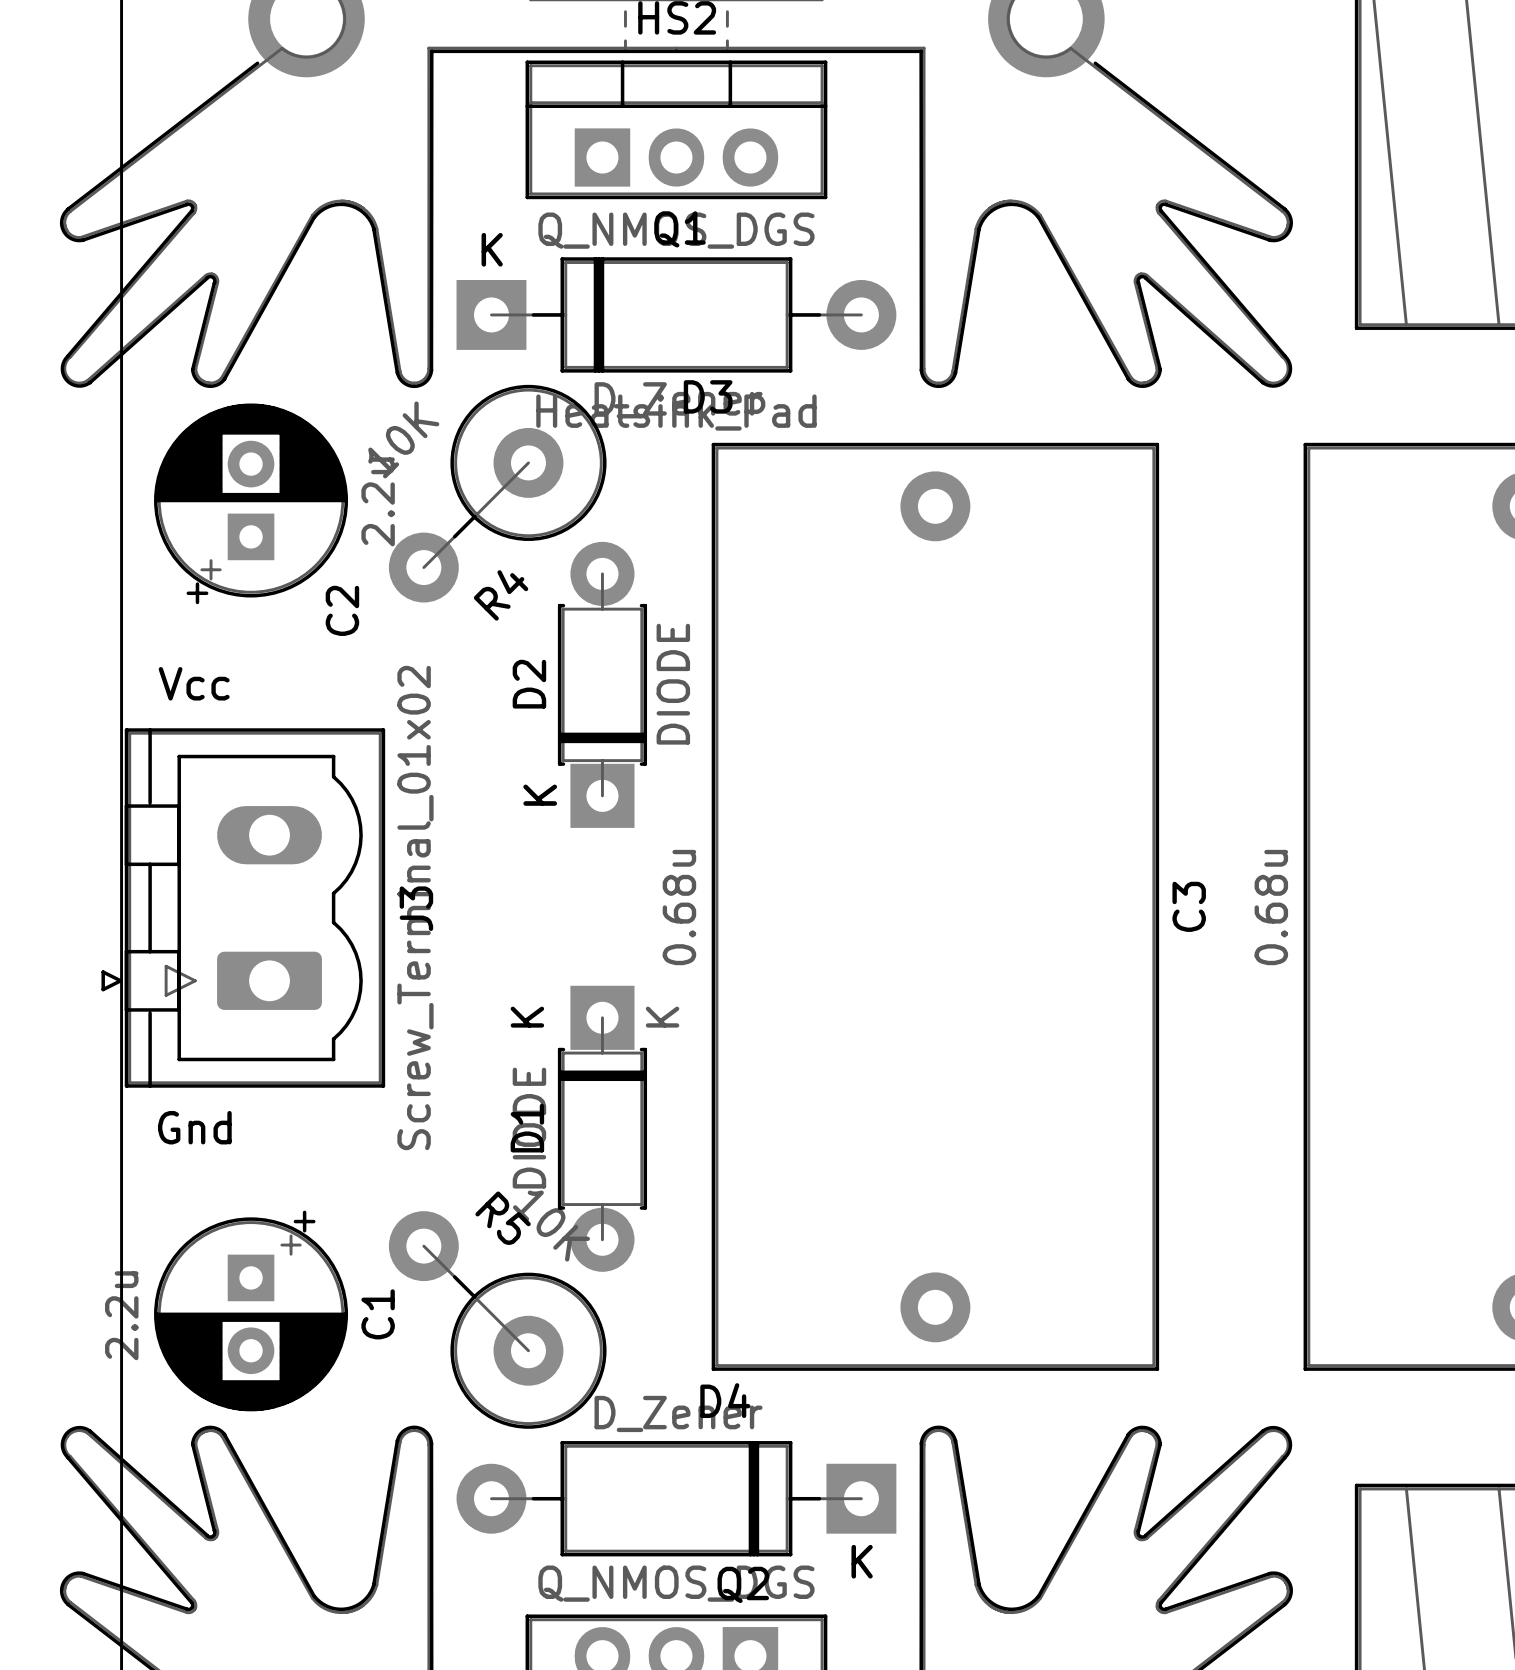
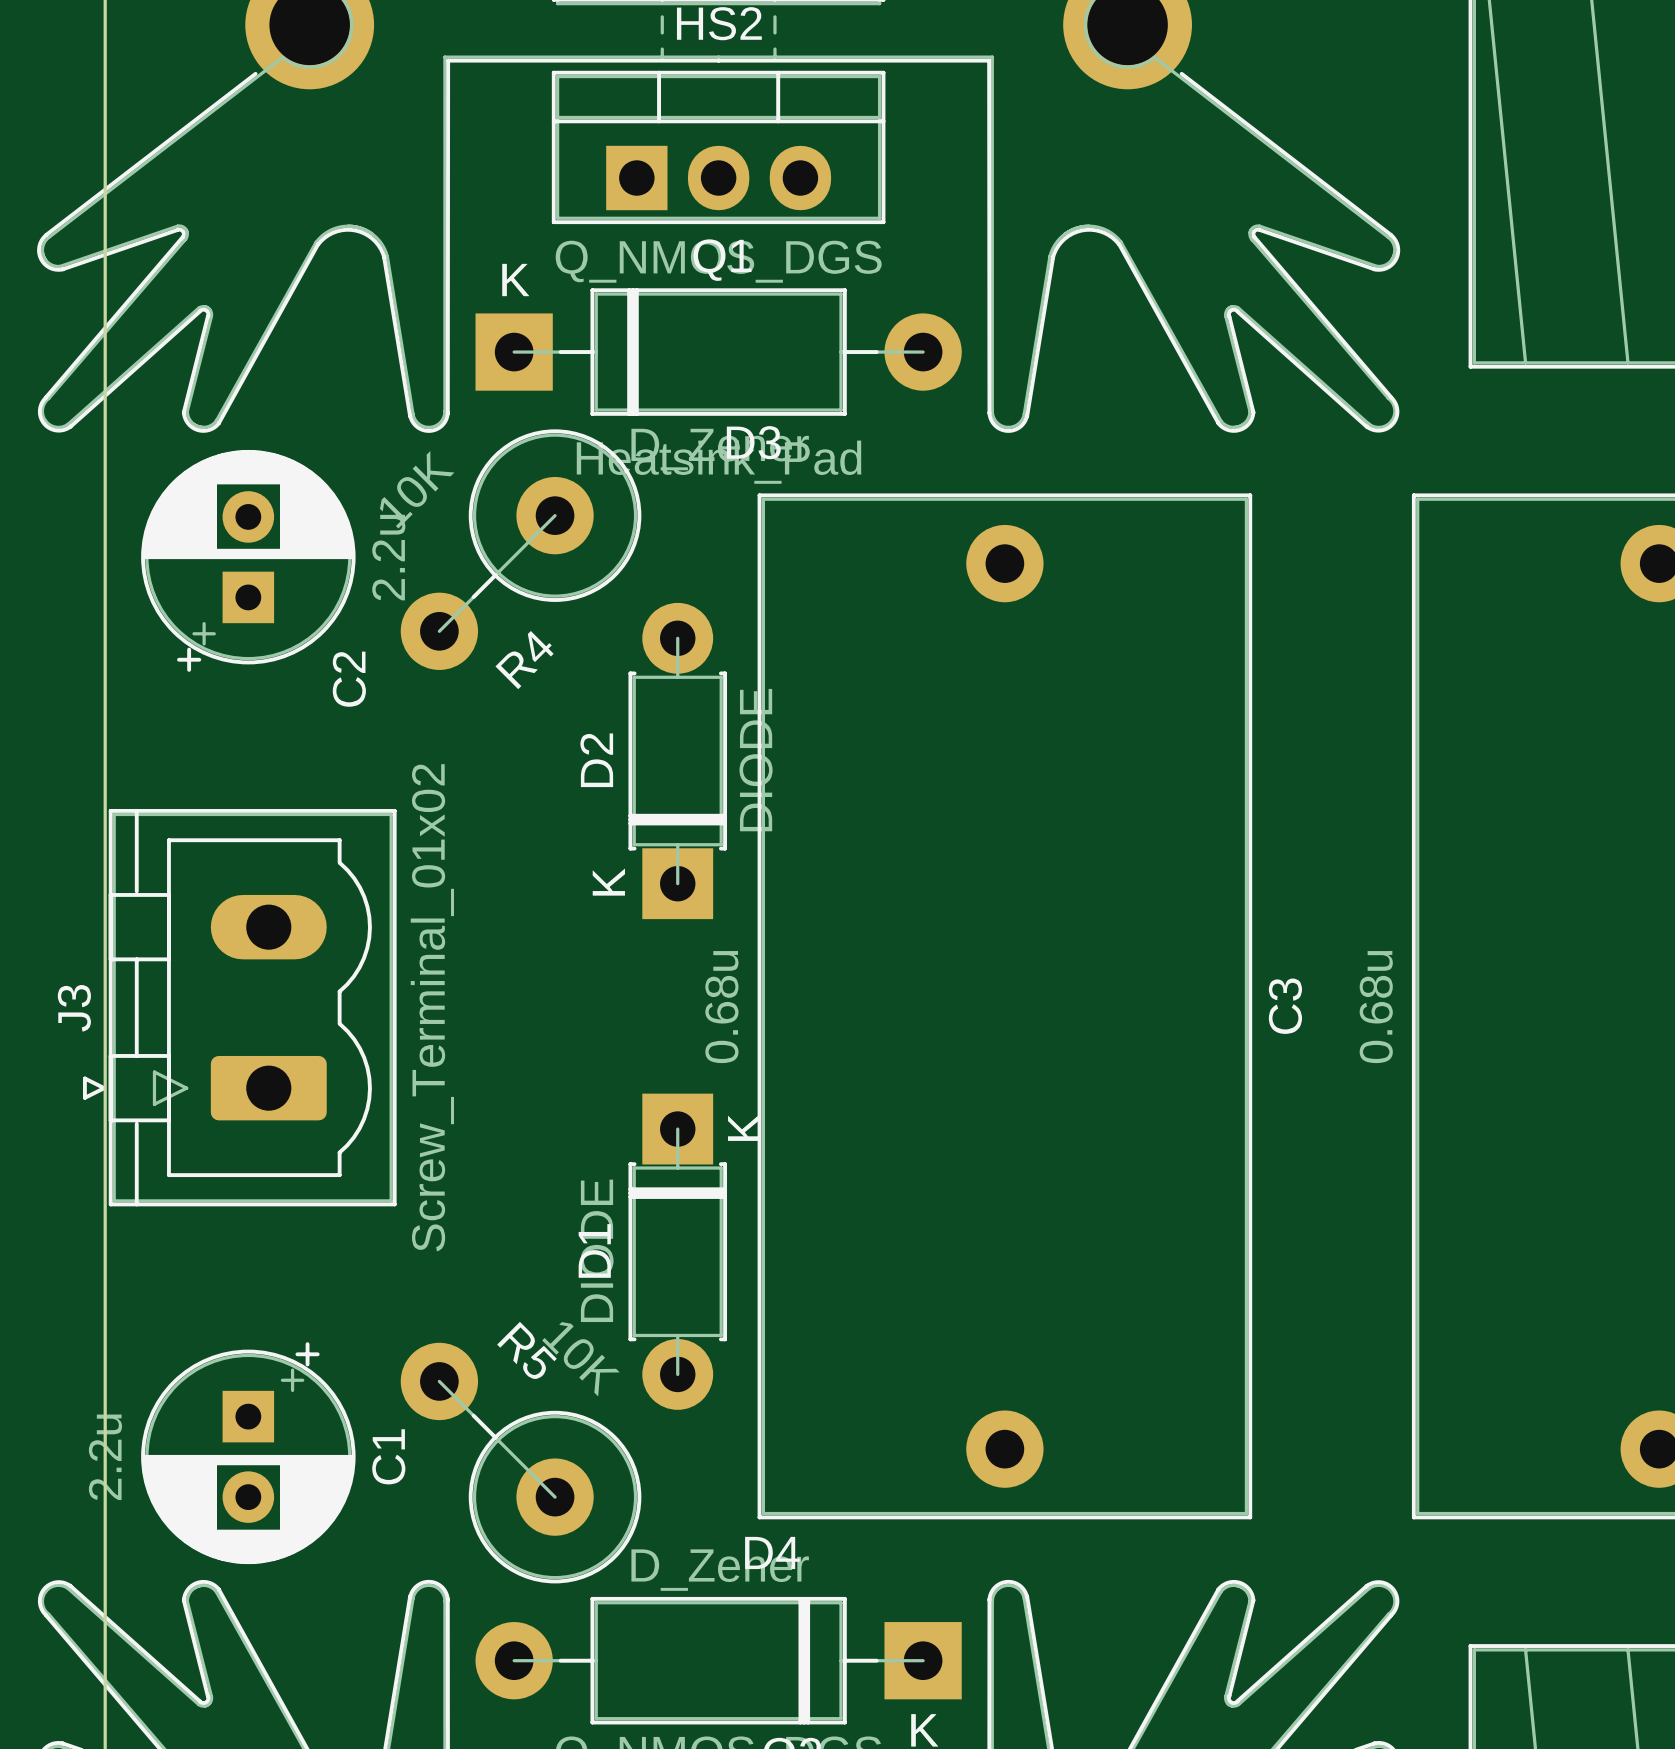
text: Vcc (194, 683) -> none
D2 position: (602, 684) -> (677, 761)
J3 name position: J3 (416, 908) -> J3 (74, 1008)
D1 footprint: [557, 985, 648, 1272] -> [628, 1093, 728, 1410]
text: Gnd (194, 1127) -> none

